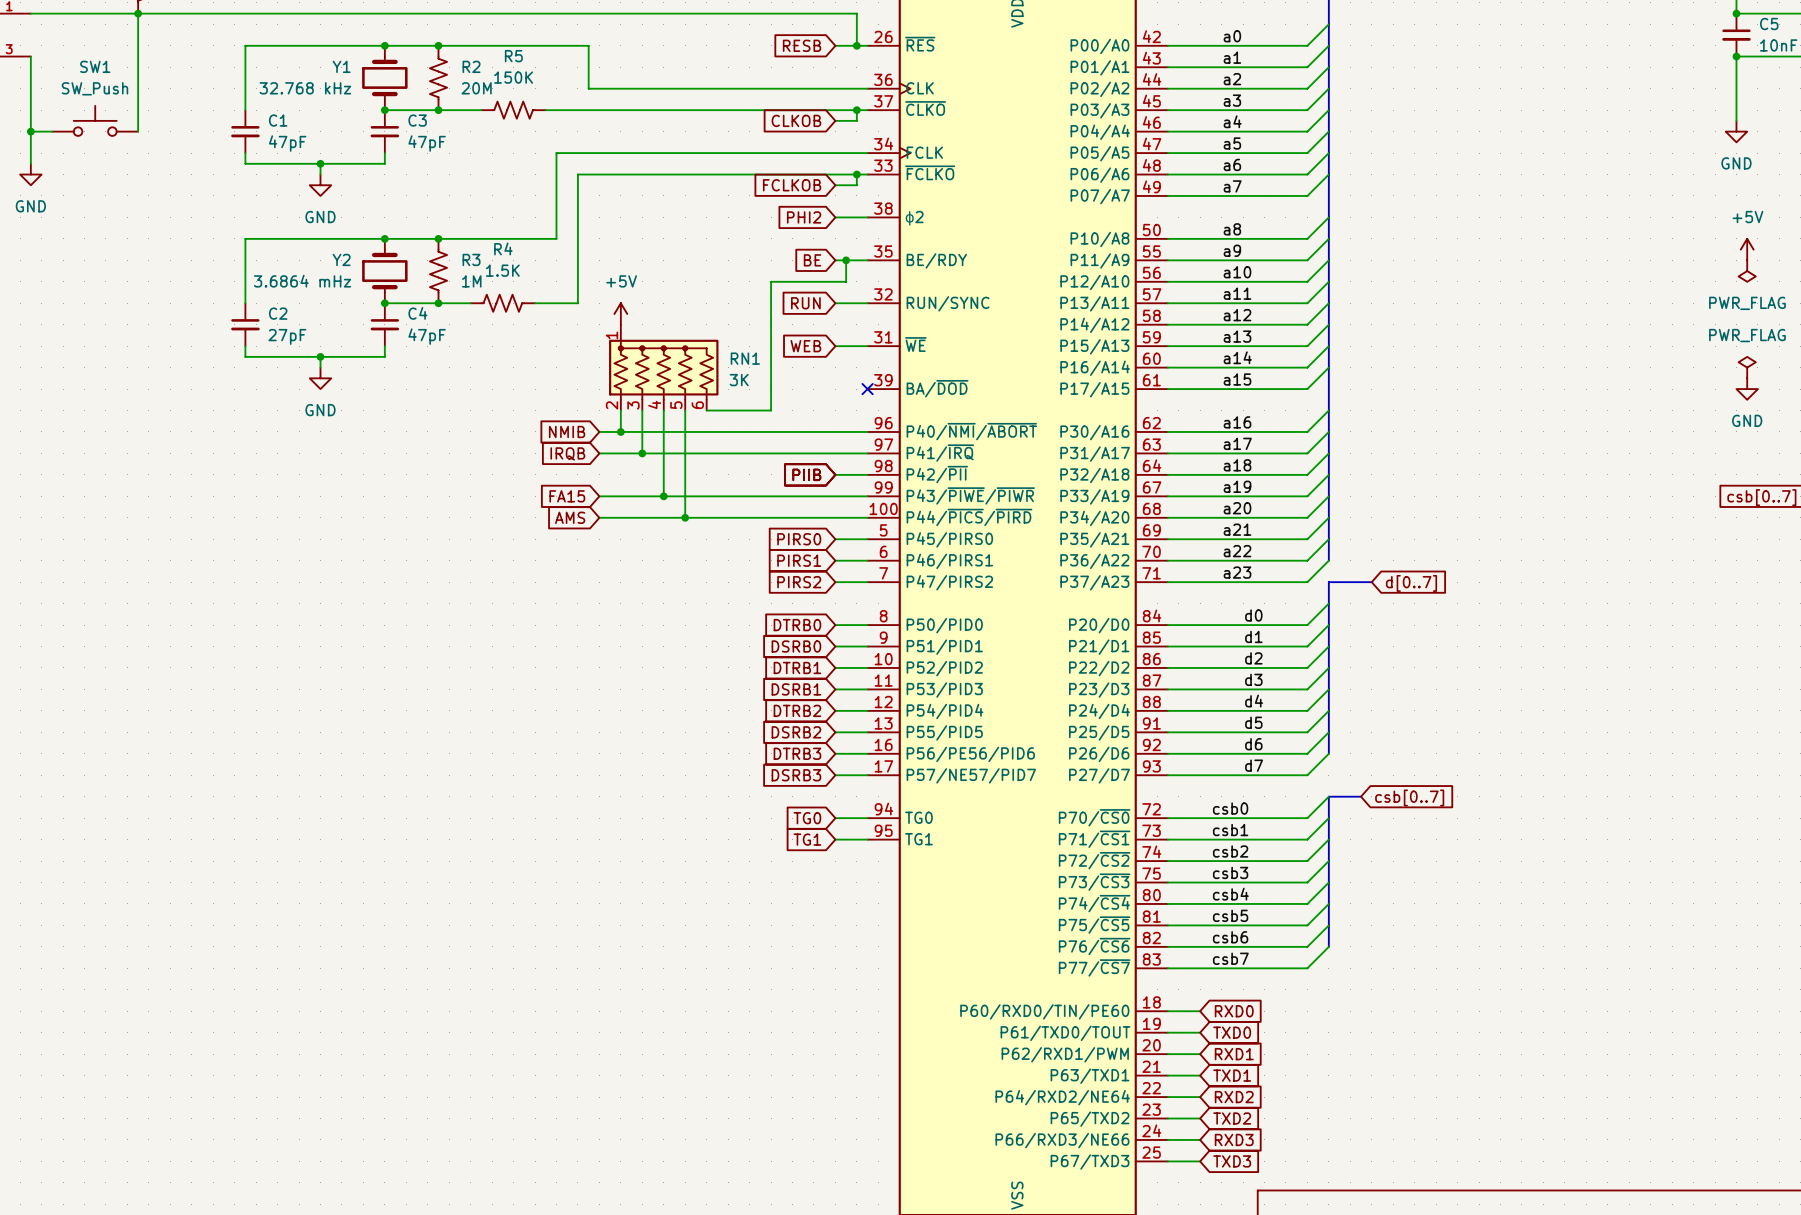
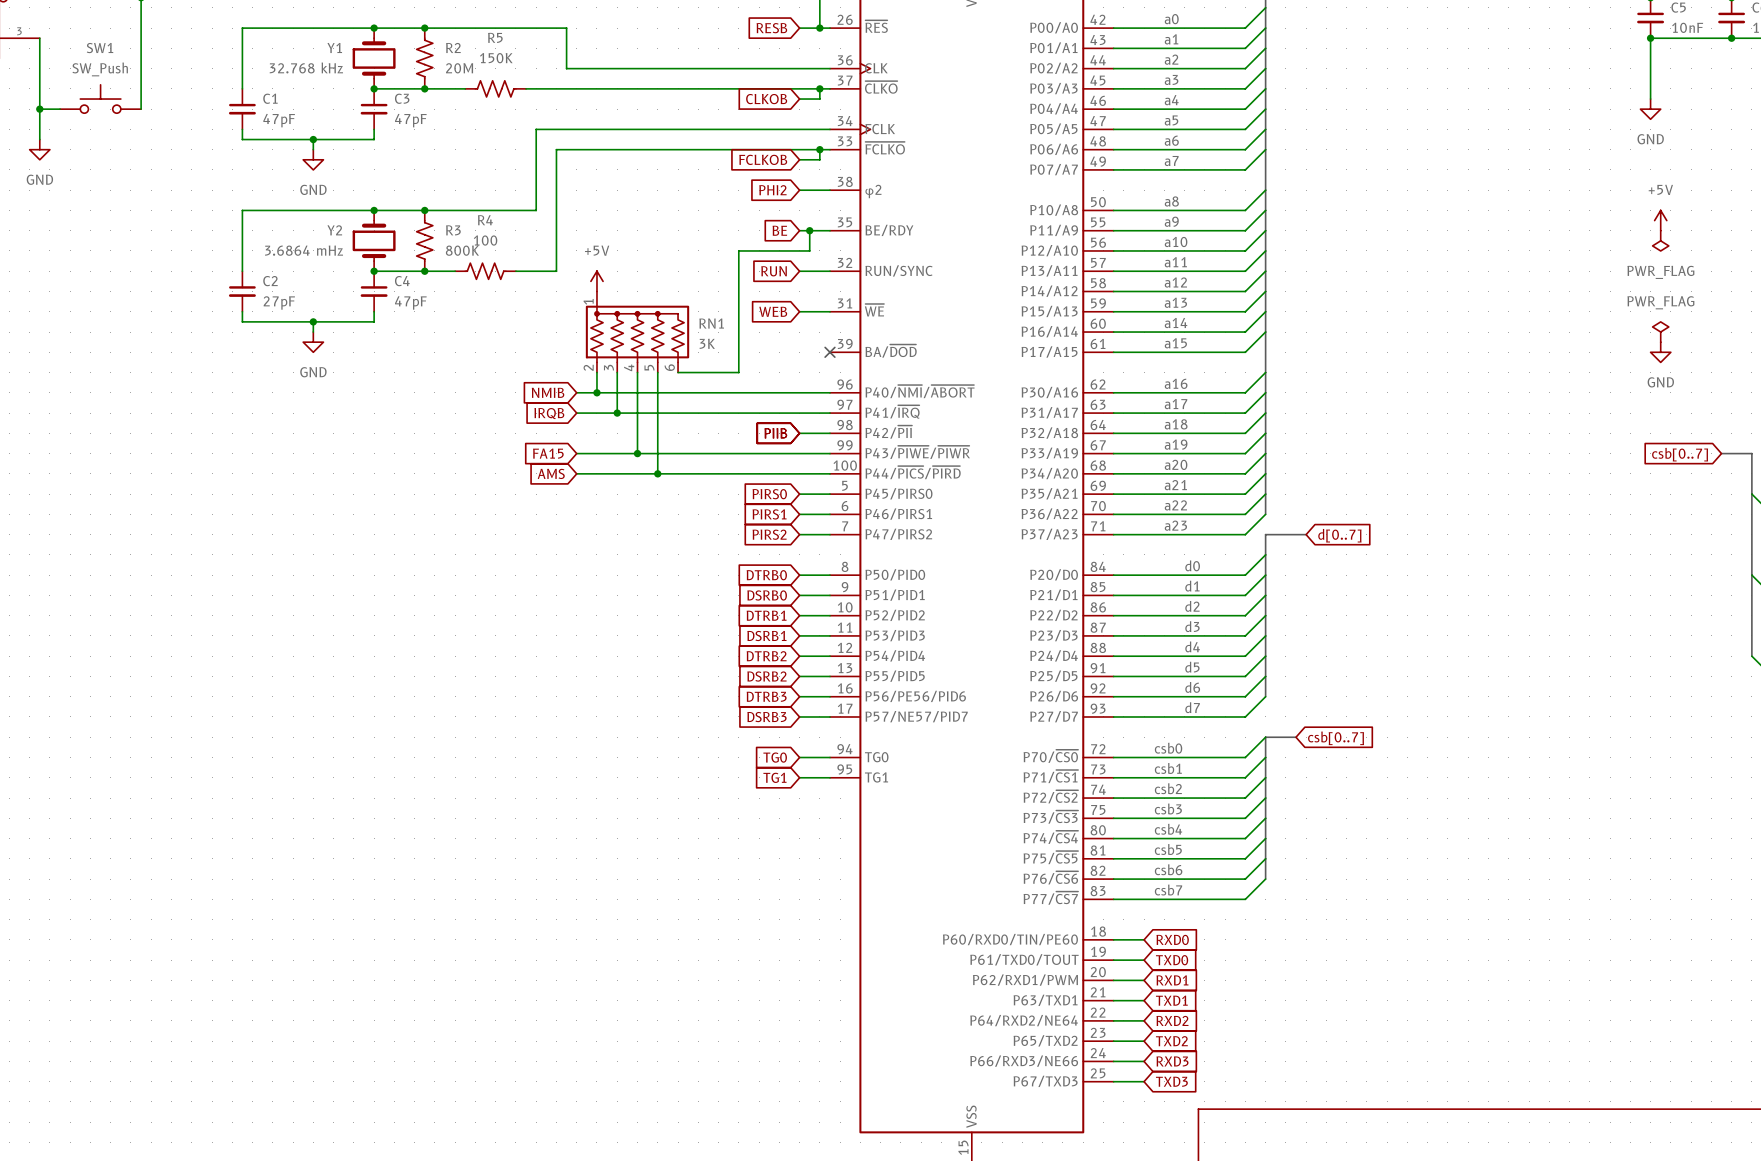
R4 value: 1.5K (502, 270) -> 100 (485, 240)
R3 value: 1M (471, 281) -> 800K (462, 250)

